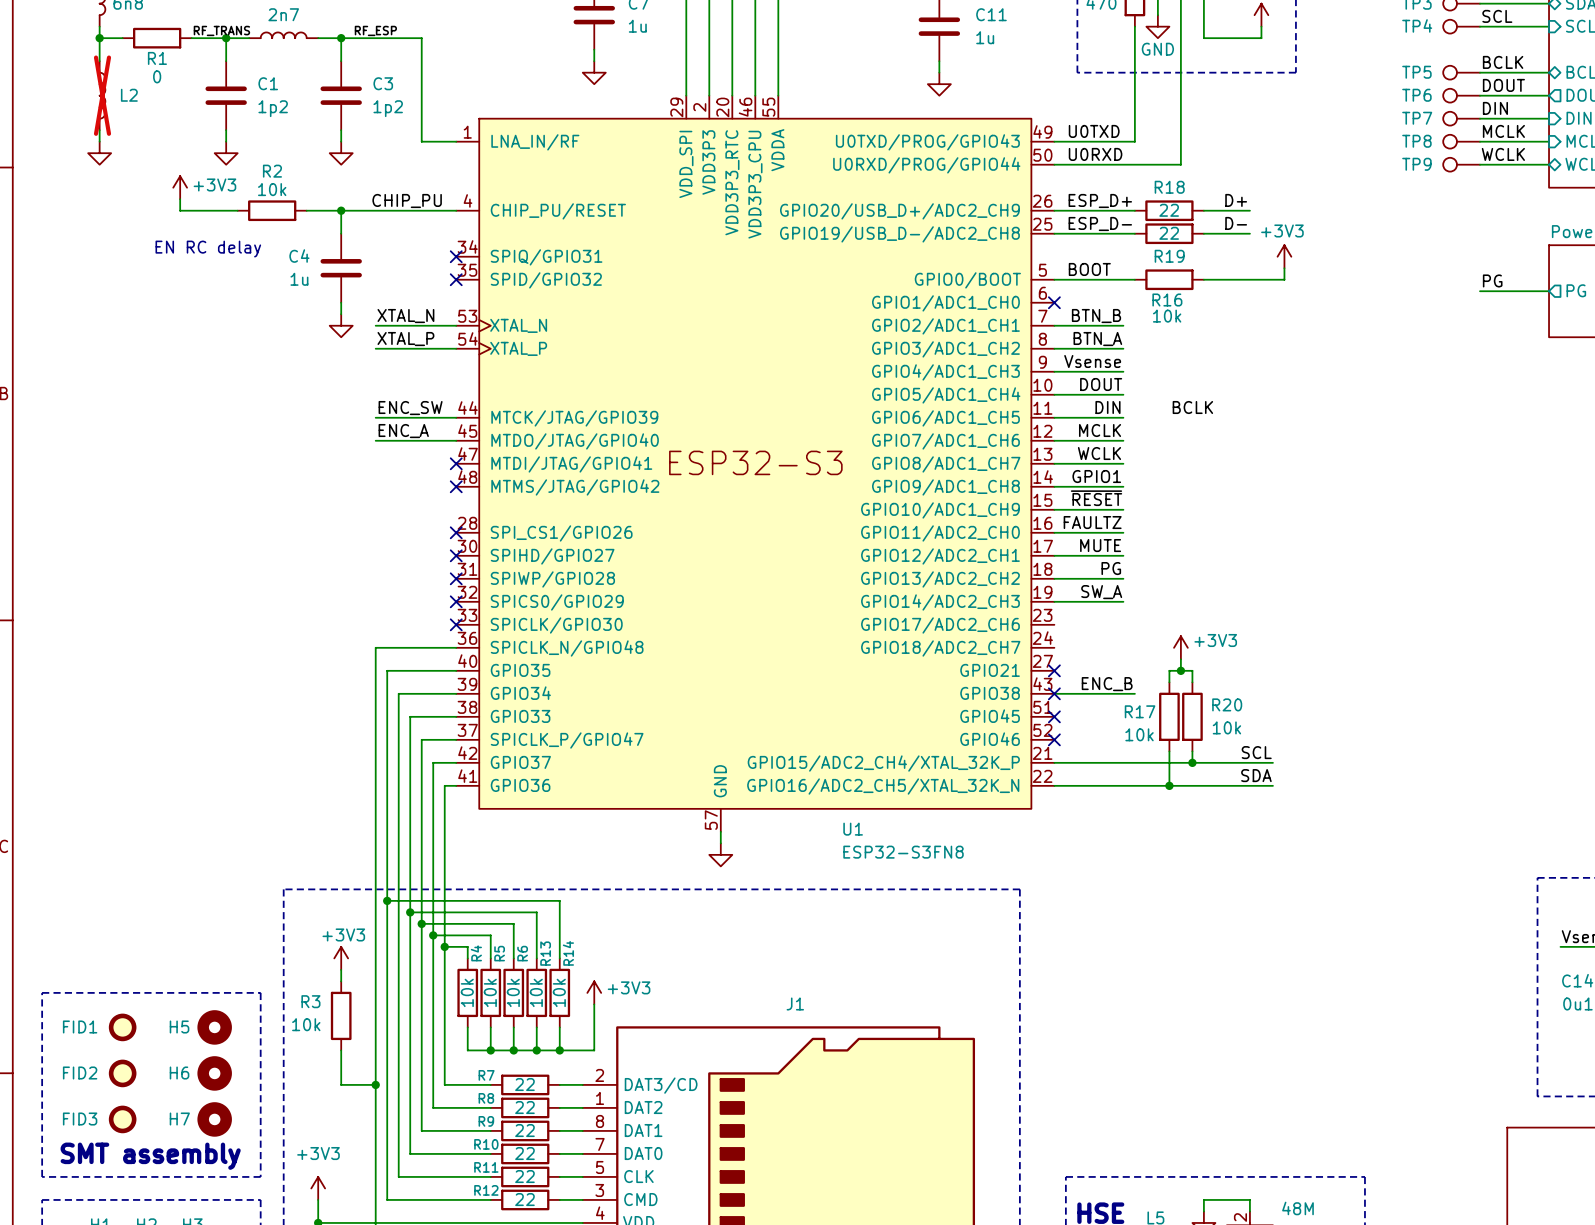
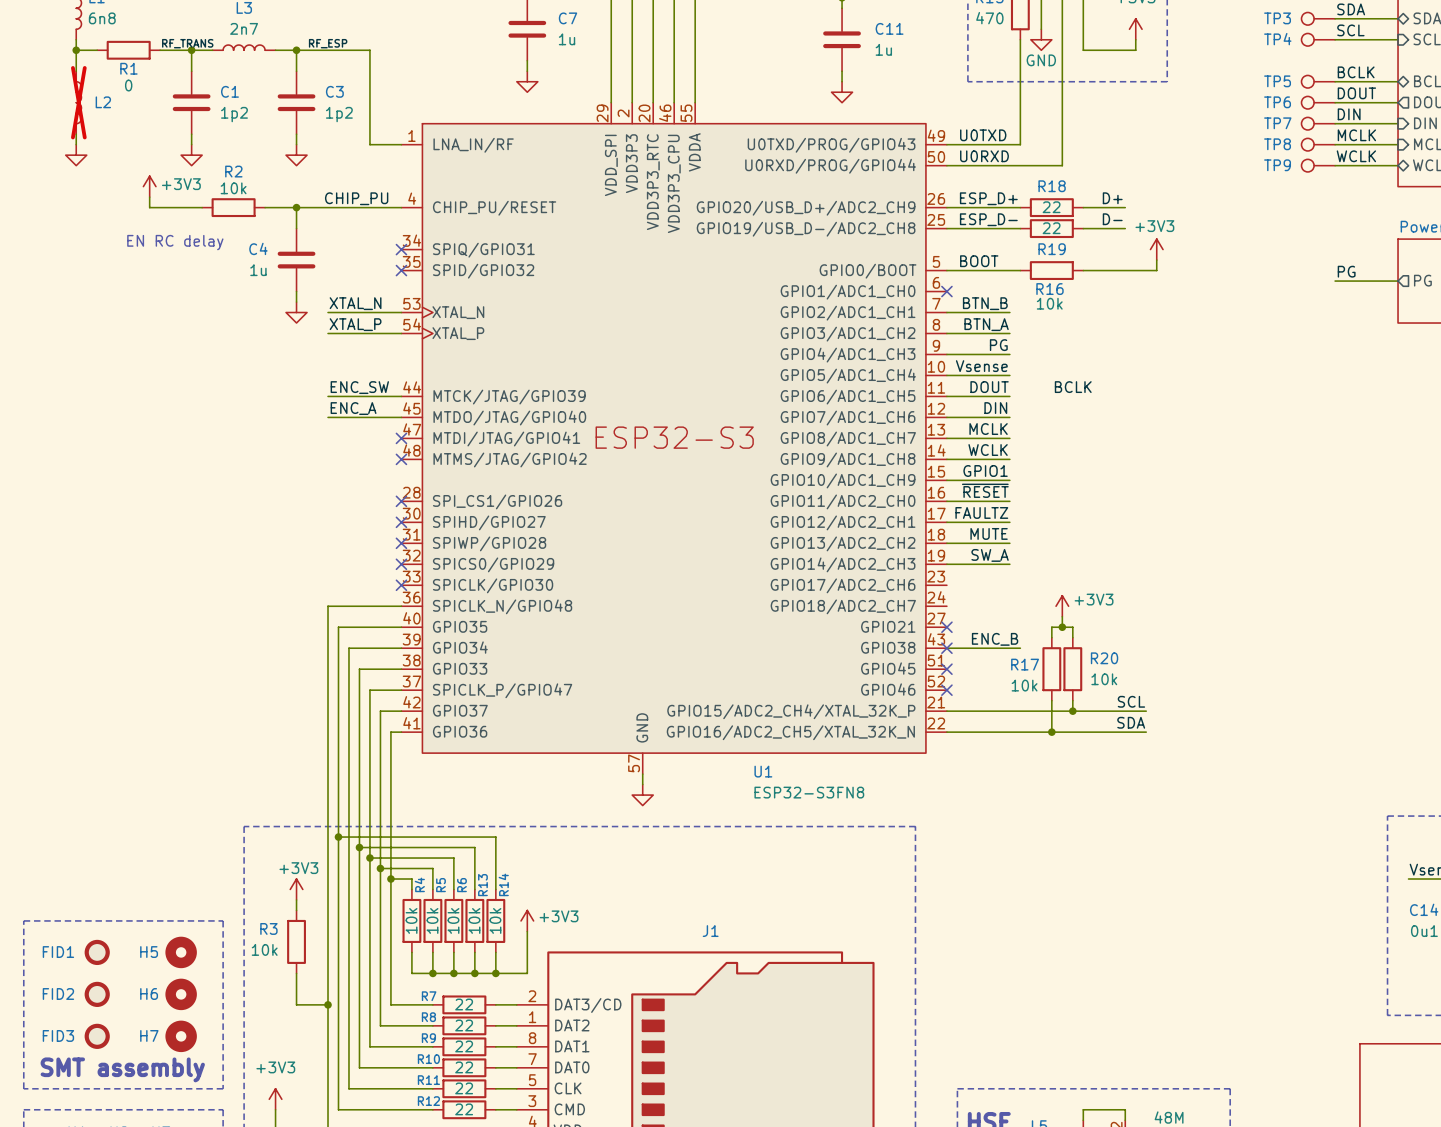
label: Vsense (1092, 361) -> PG (998, 345)
label: DOUT (1101, 384) -> Vsense (981, 366)
label: DIN (1107, 407) -> DOUT (989, 387)
label: MCLK (1100, 430) -> DIN (995, 408)
label: WCLK (1099, 453) -> MCLK (988, 429)
label: GPIO1 (1096, 476) -> WCLK (988, 450)
label: ~{RESET} (1096, 498) -> GPIO1 (985, 471)
label: FAULTZ (1092, 522) -> ~{RESET} (985, 490)
label: MUTE (1100, 545) -> FAULTZ (981, 512)
label: PG (1111, 568) -> MUTE (989, 533)

